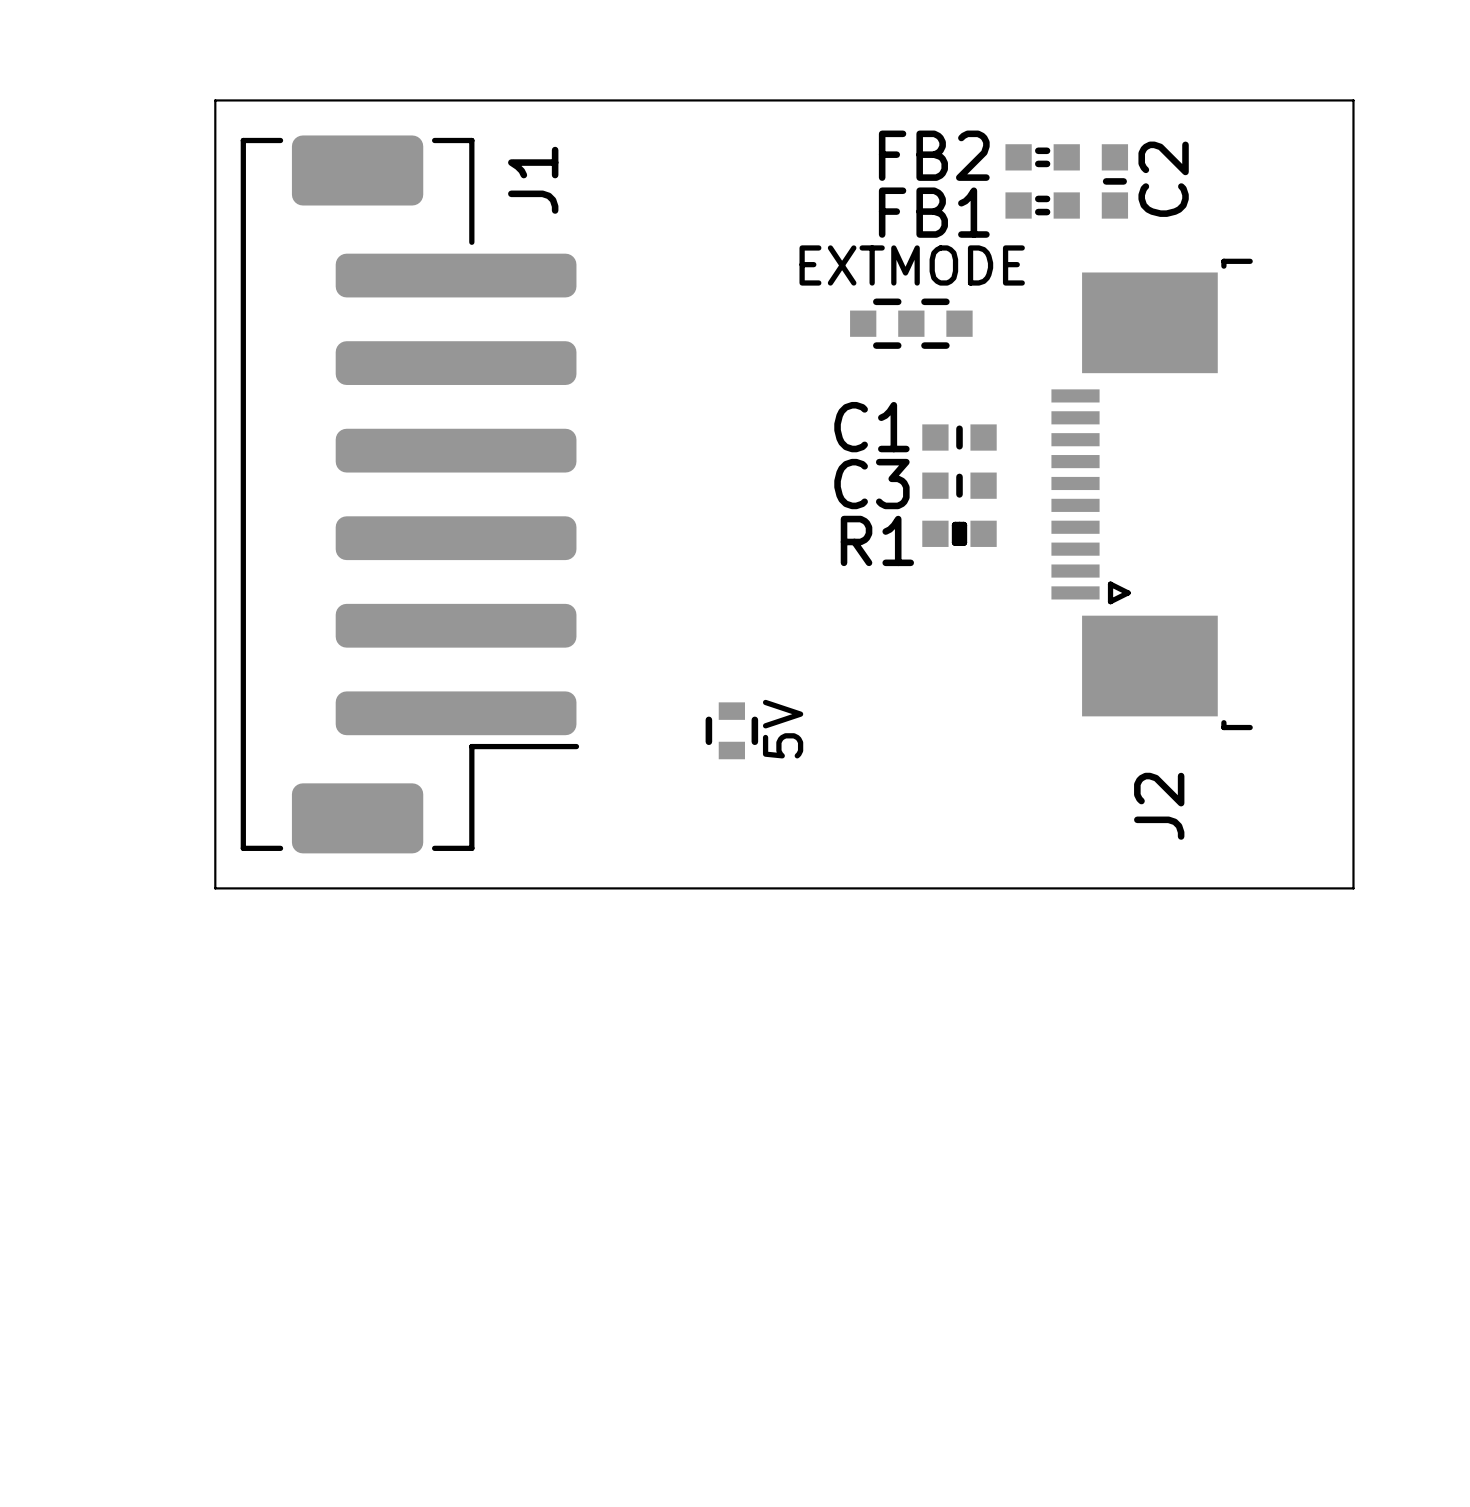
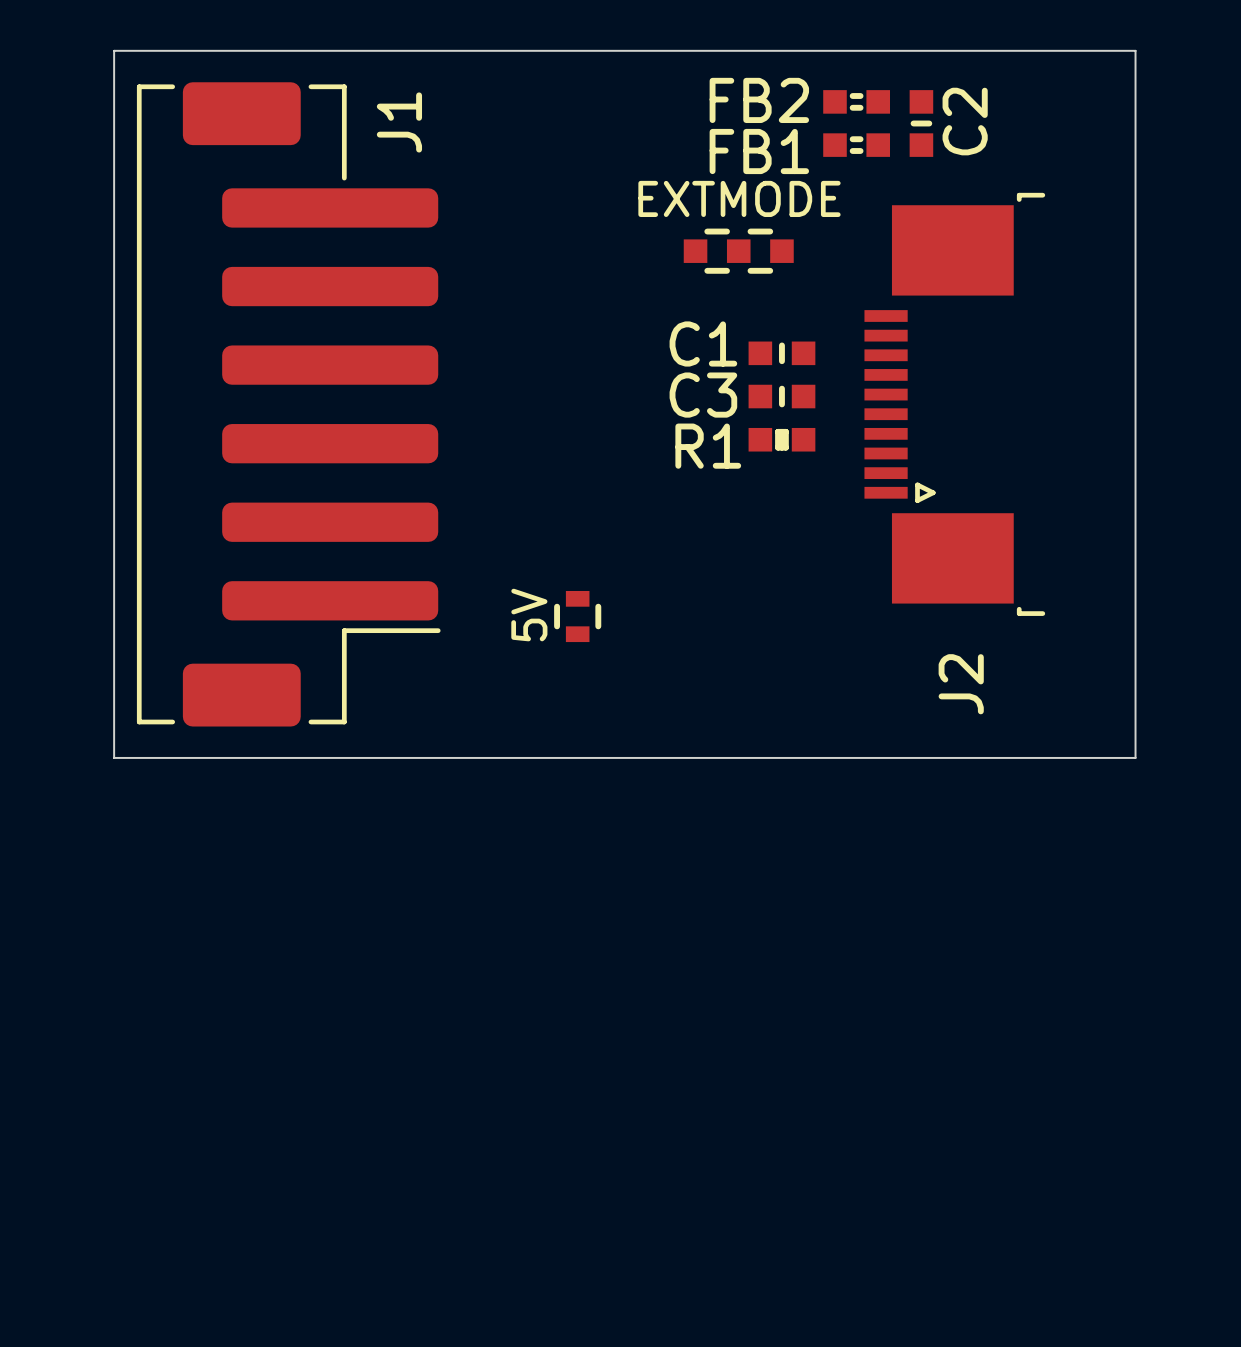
part value position: 5V (783, 729) -> 5V (529, 615)

